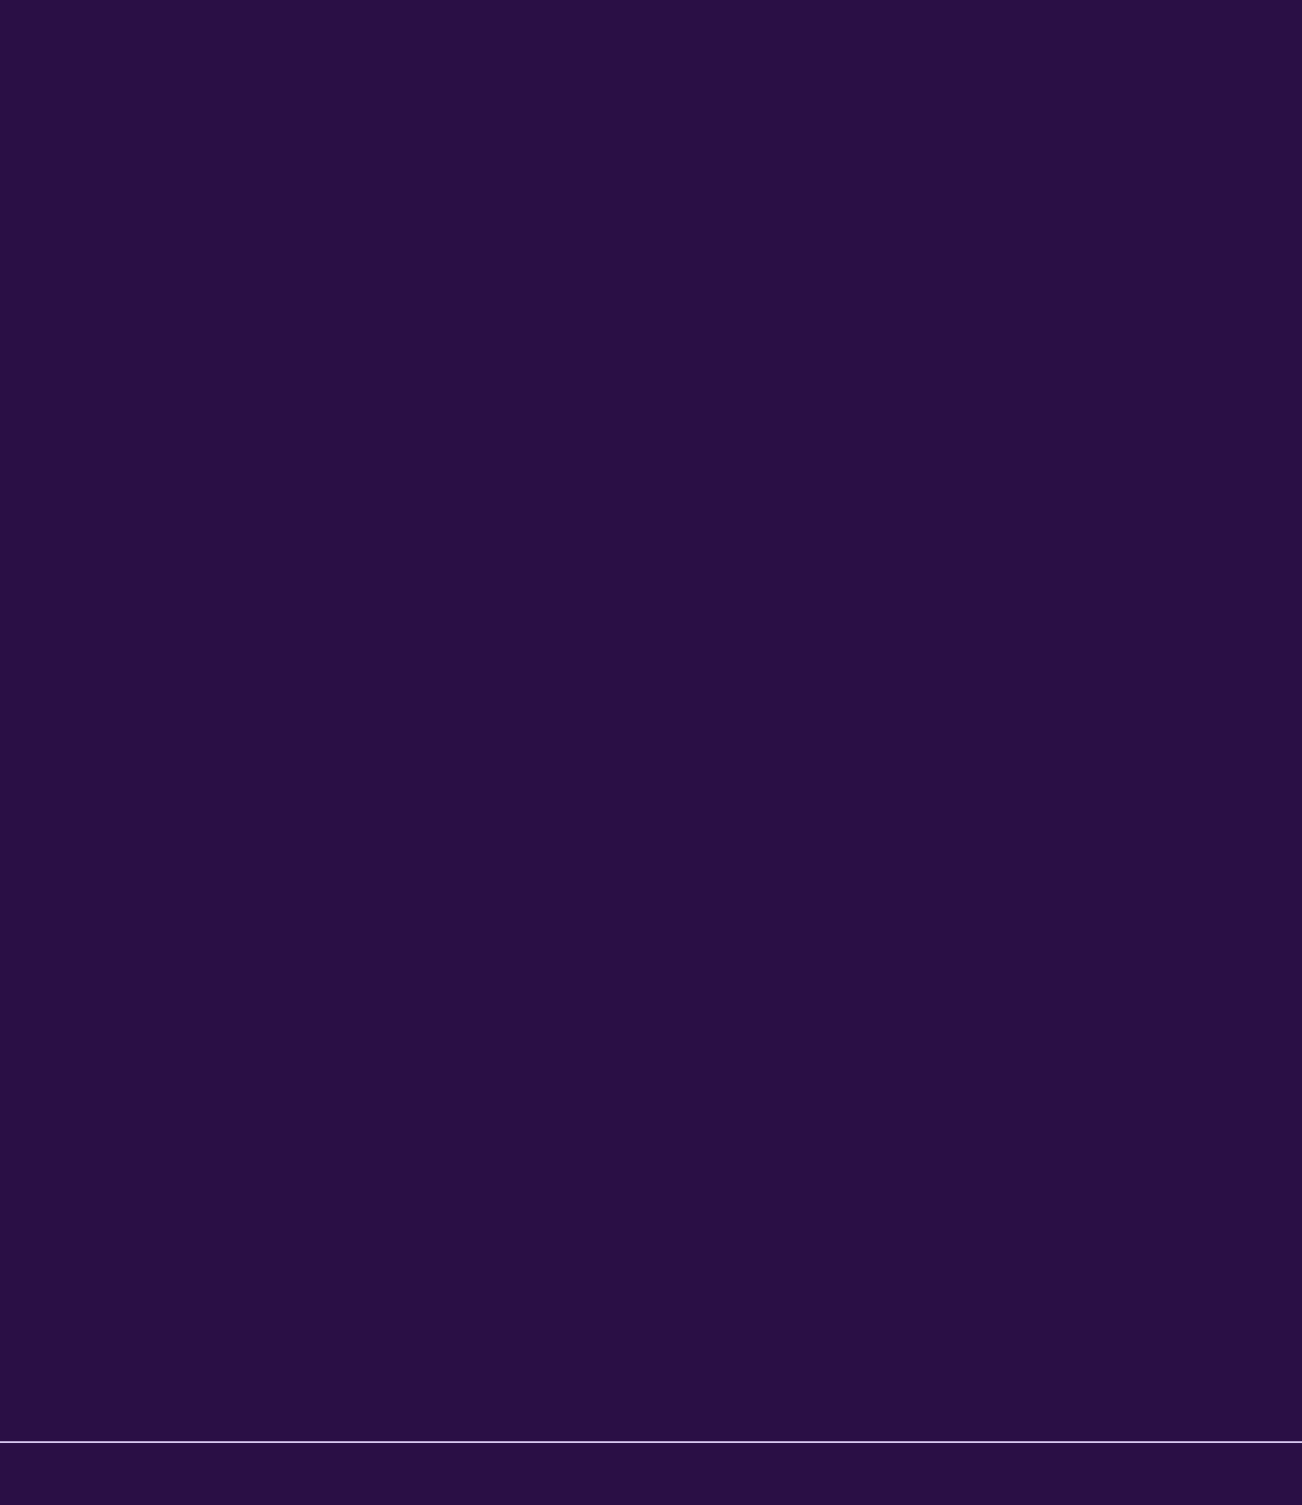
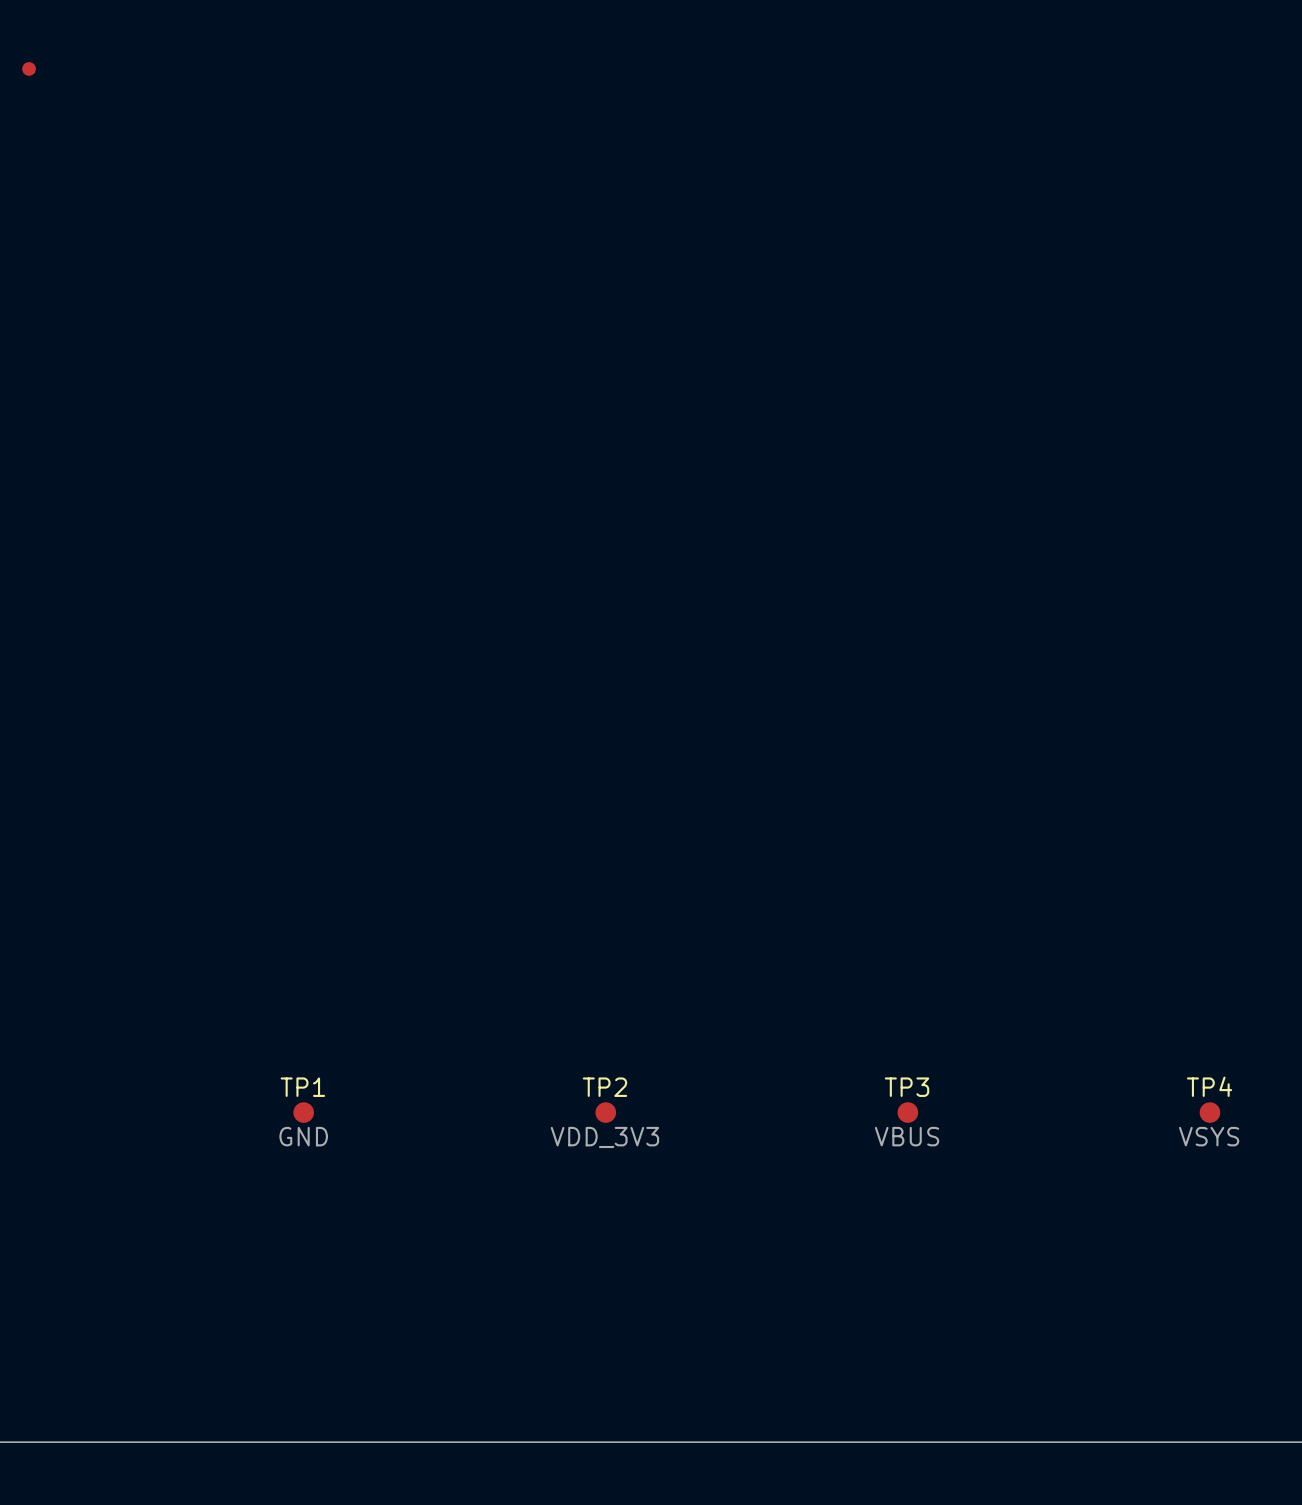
part: none -> (29, 68)
TP1: none -> GND (303, 1112)
TP2: none -> VDD_3V3 (605, 1112)
TP3: none -> VBUS (907, 1112)
TP4: none -> VSYS (1209, 1112)

